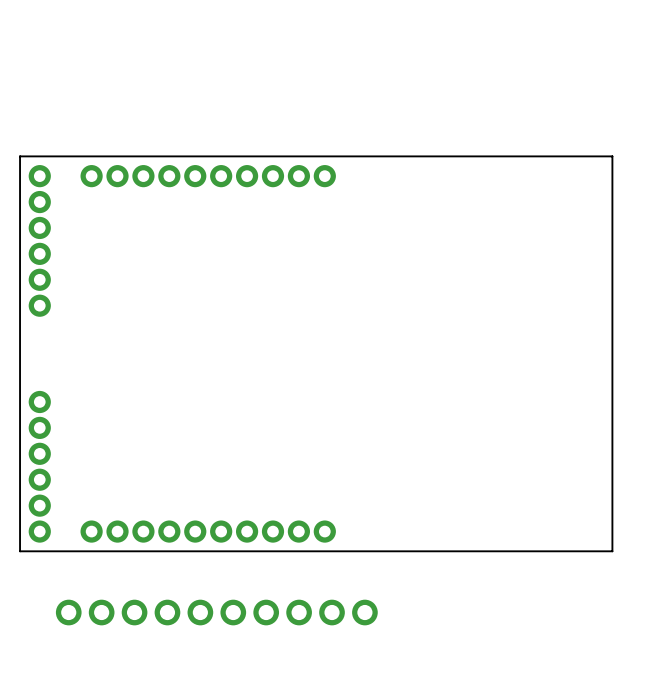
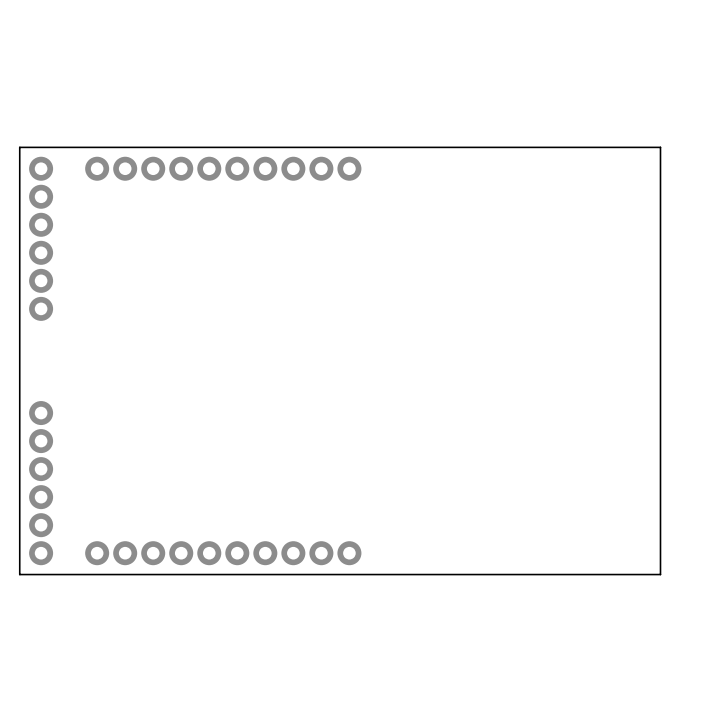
part: (216, 612) -> none

